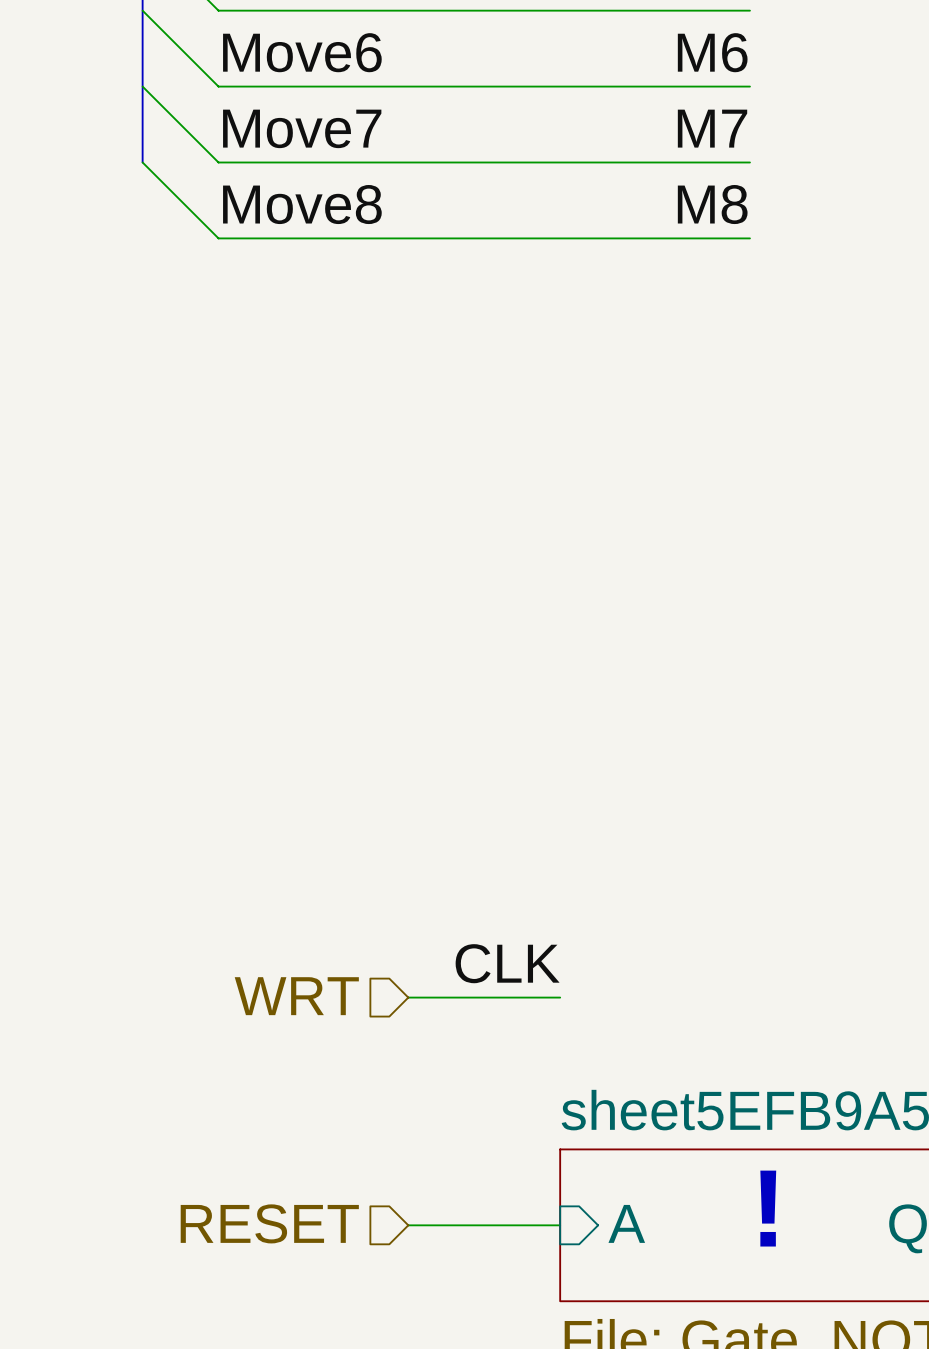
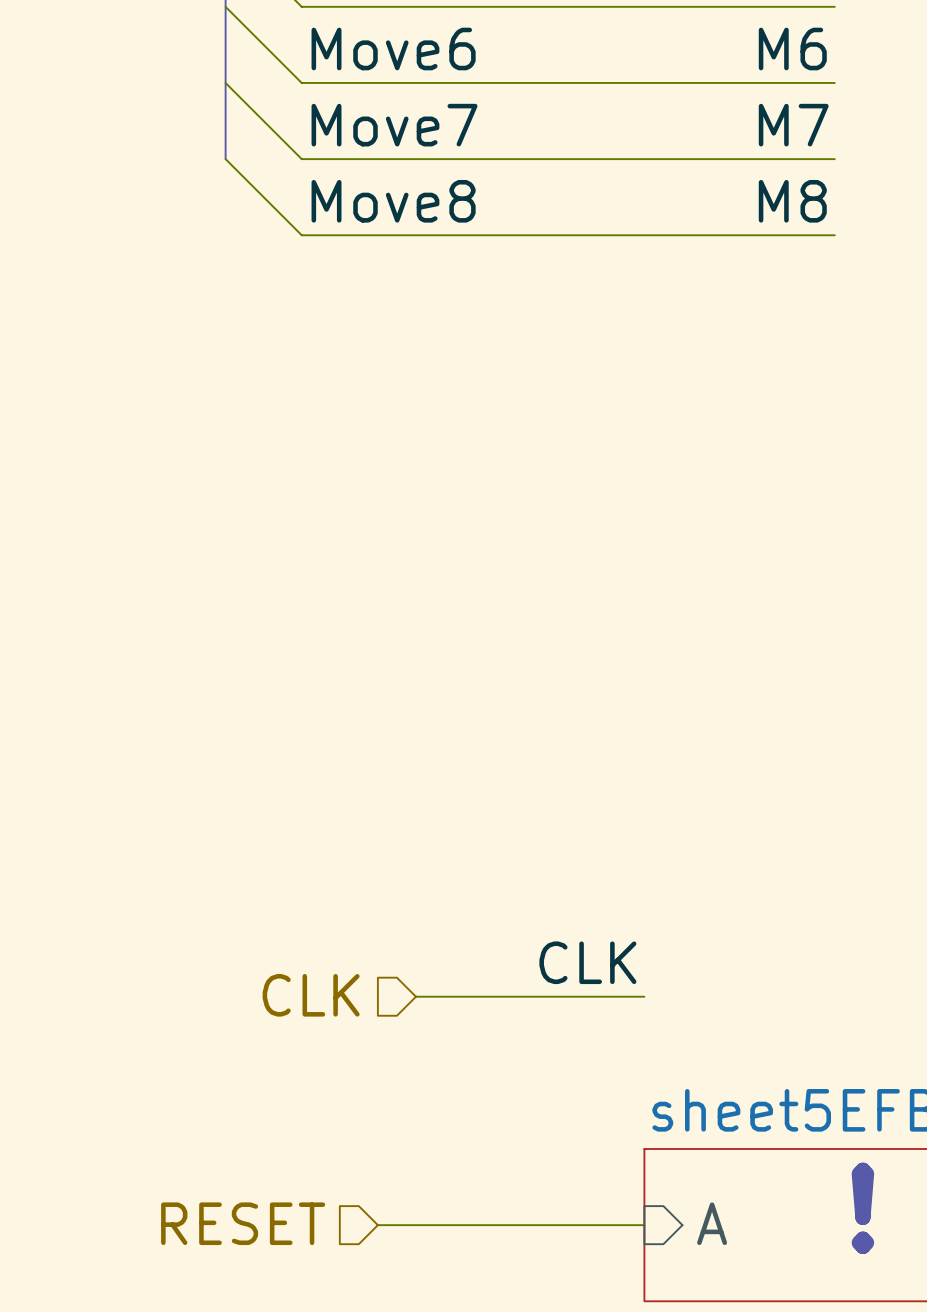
hierarchical label: none -> CLK (311, 995)
hierarchical label: WRT (296, 996) -> none
wire: none -> (415, 996) (492, 996)
hierarchical label position: RESET (269, 1223) -> RESET (243, 1223)
wire: none -> (377, 1225) (492, 1225)

